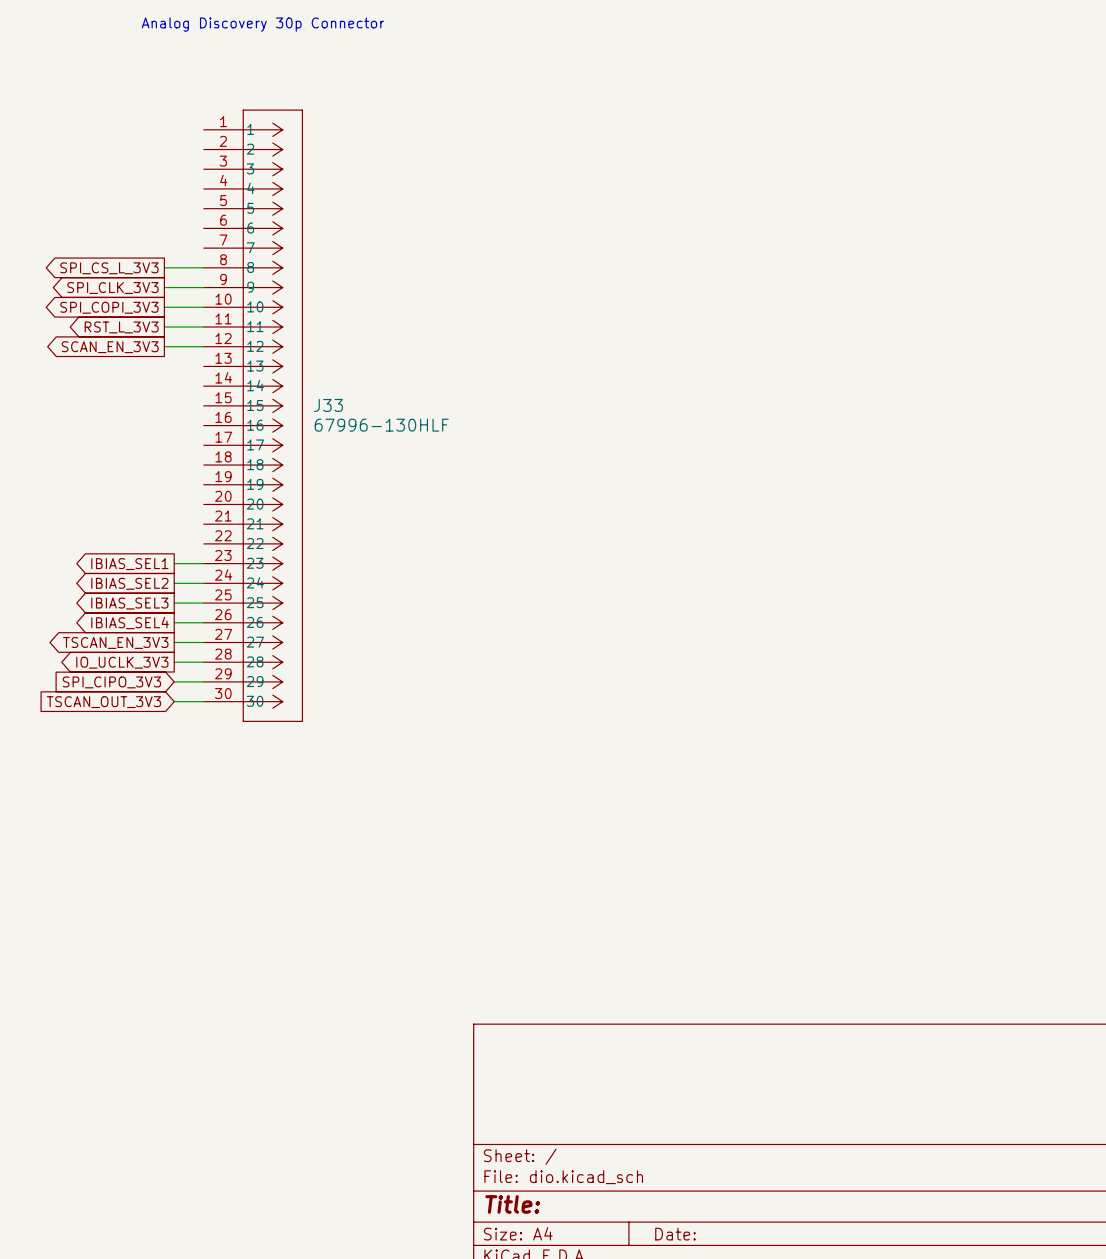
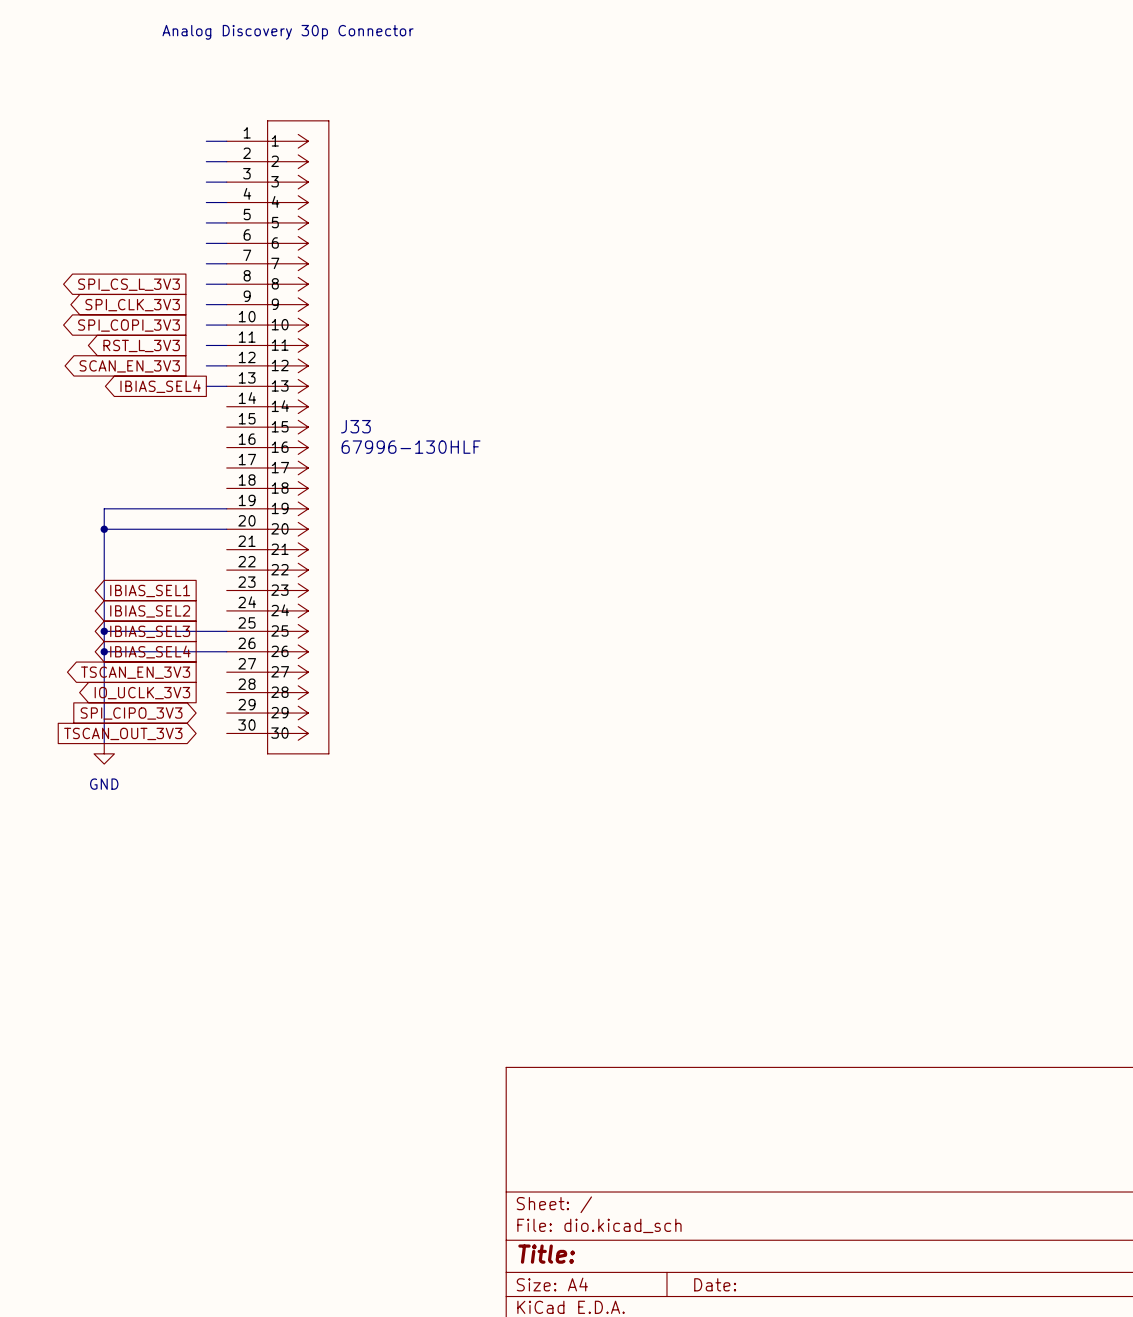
wire: none -> (206, 141) (226, 141)
wire: none -> (206, 161) (226, 161)
wire: (164, 267) (184, 267) -> (206, 182) (226, 182)
wire: (164, 287) (184, 287) -> (206, 202) (226, 202)
wire: (164, 307) (184, 307) -> (206, 222) (226, 222)
wire: (164, 326) (184, 326) -> (206, 243) (226, 243)
wire: (164, 346) (184, 346) -> (206, 263) (226, 263)
global label: none -> IBIAS_SEL4 (160, 386)
wire: none -> (206, 386) (226, 386)
wire: none -> (226, 508) (104, 508) (104, 743)
wire: none -> (104, 529) (226, 529)
junction: none -> (104, 529)
wire: (174, 563) (203, 563) -> none
wire: (174, 583) (203, 583) -> none
wire: none -> (104, 631) (196, 631)
junction: none -> (104, 631)
wire: none -> (104, 651) (196, 651)
junction: none -> (104, 651)
wire: (174, 642) (203, 642) -> none
wire: (174, 662) (203, 662) -> none
wire: (174, 681) (203, 681) -> none
wire: (174, 701) (203, 701) -> none
power symbol: none -> GND (104, 753)

